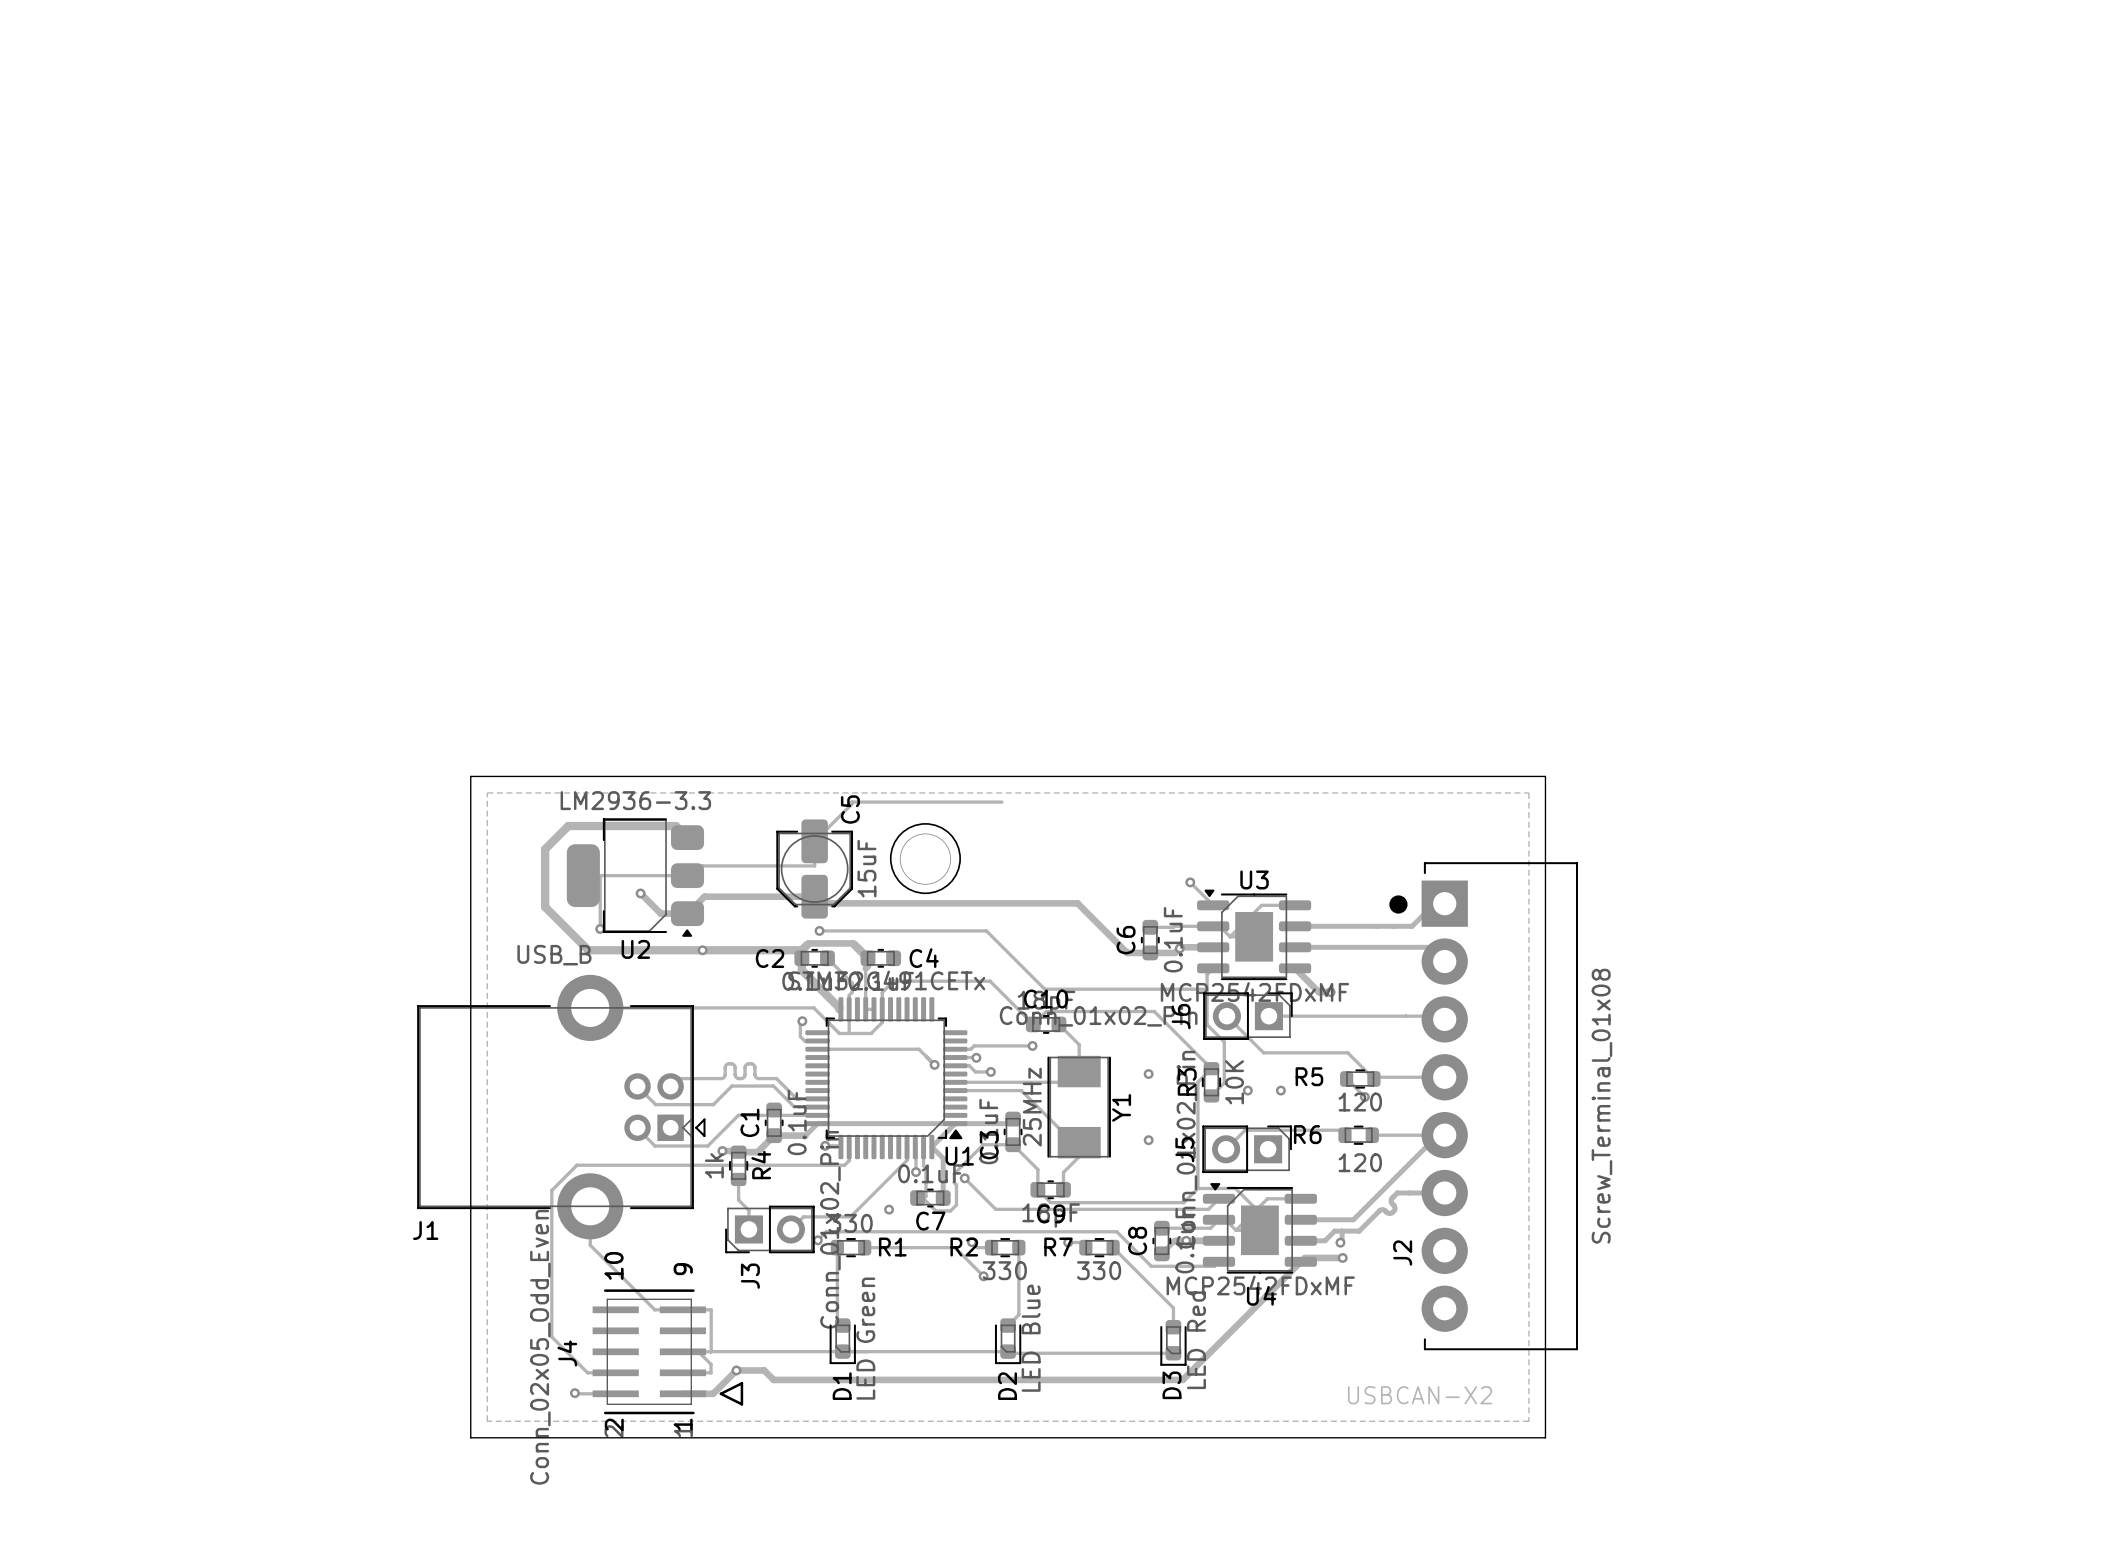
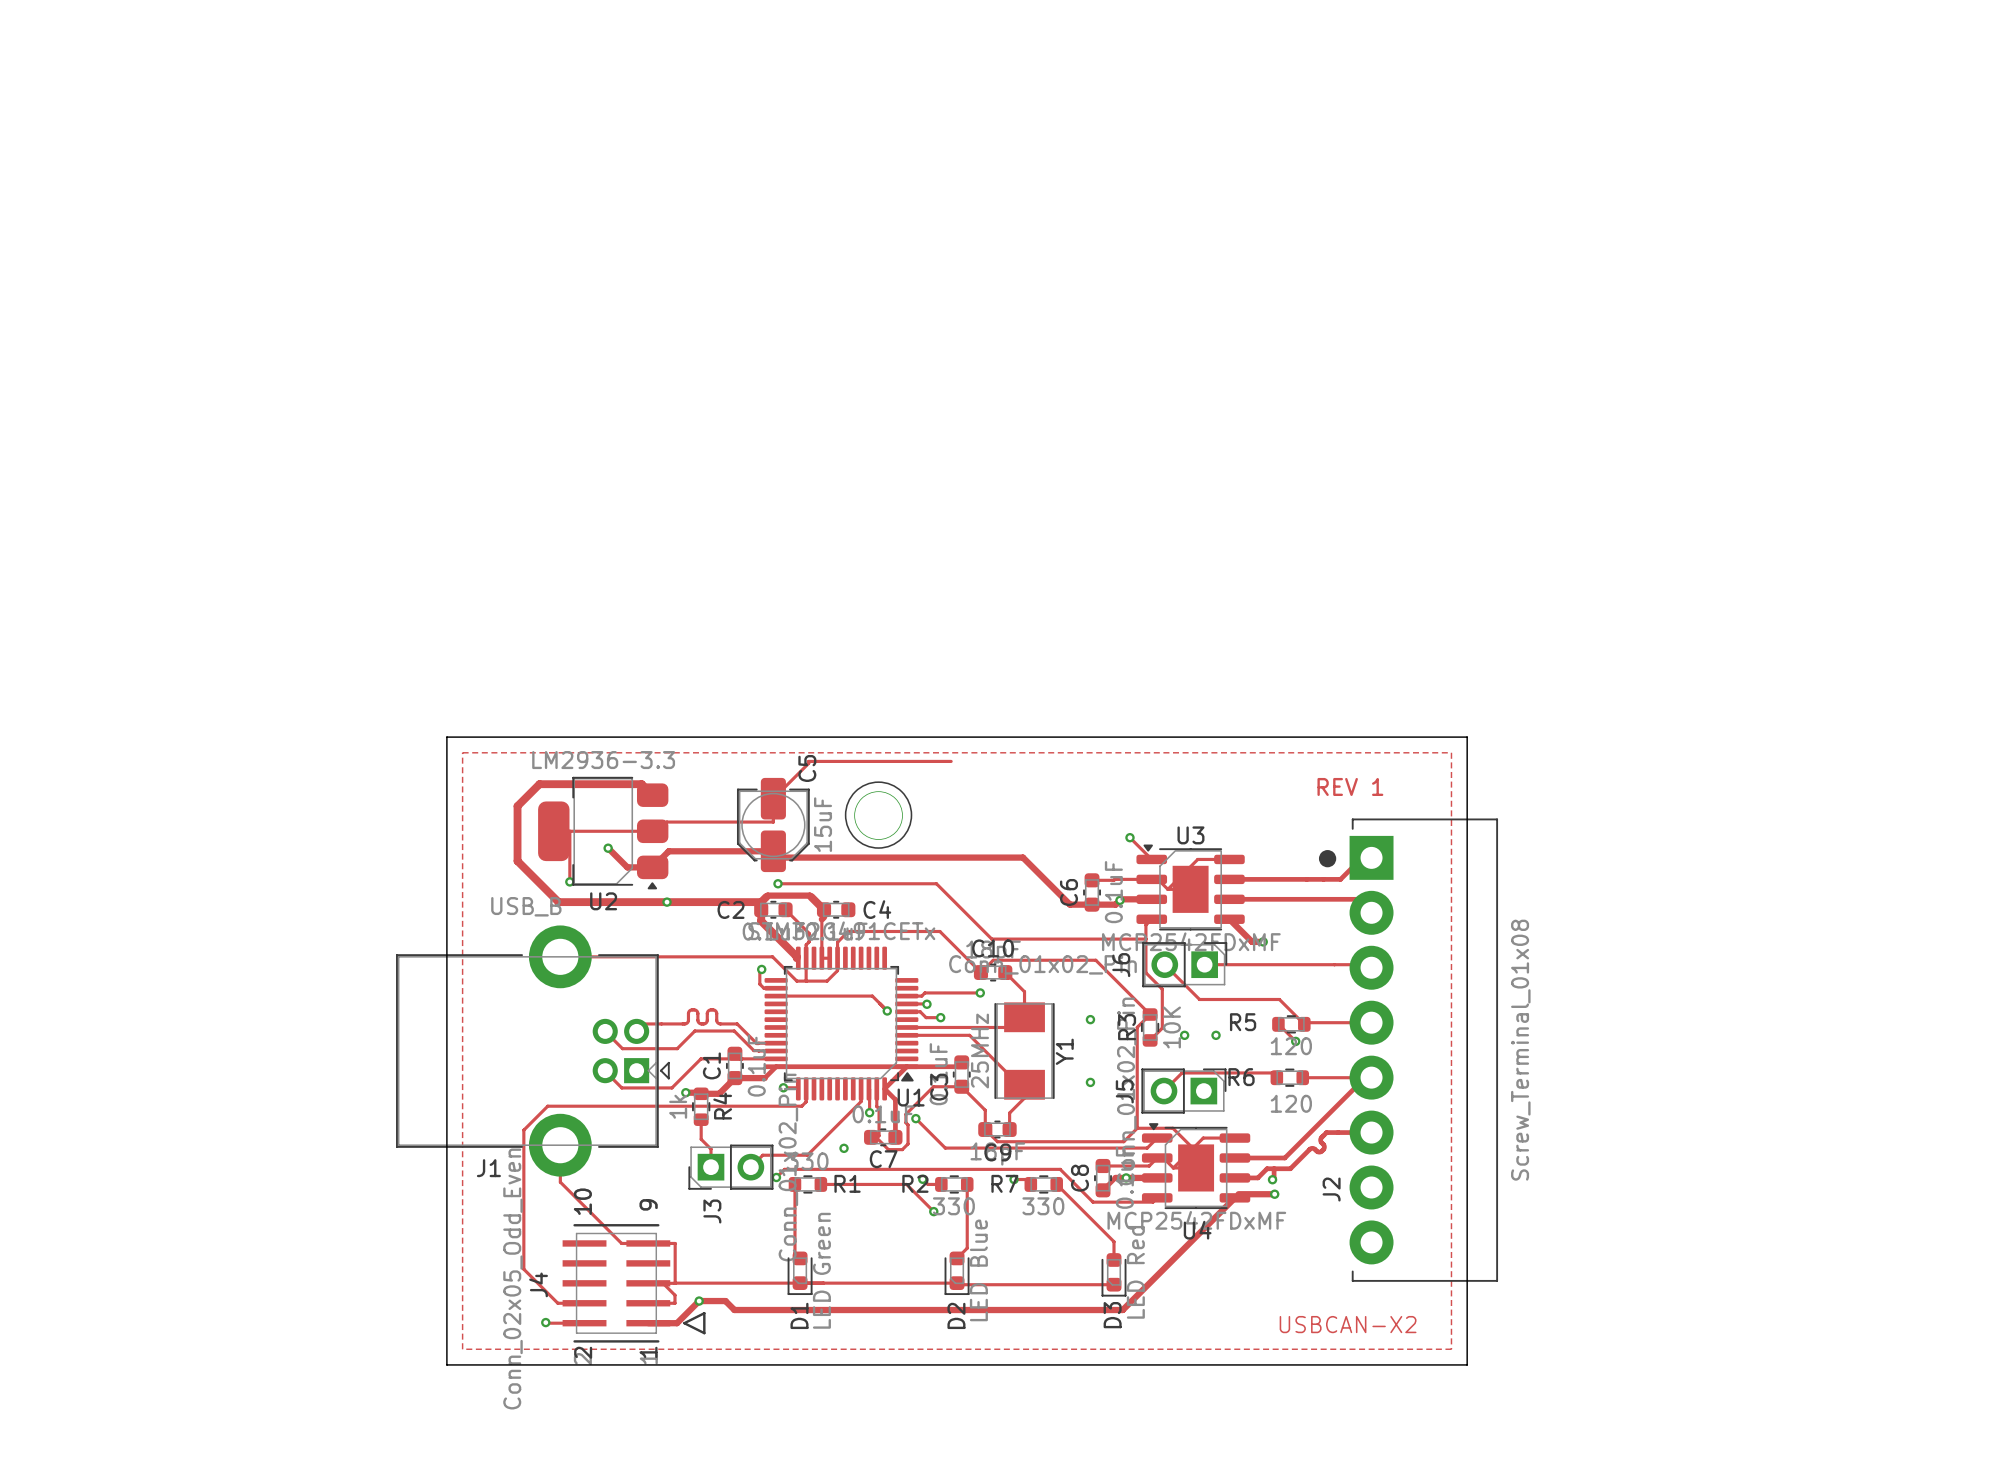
text: none -> REV 1 (1350, 786)
J1 name position: J1 (425, 1230) -> J1 (488, 1168)

